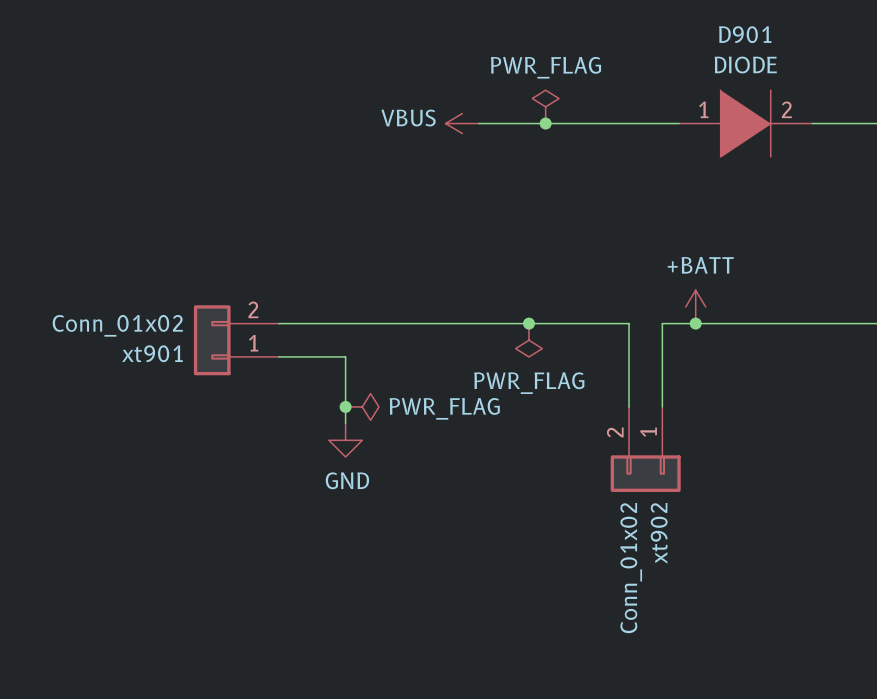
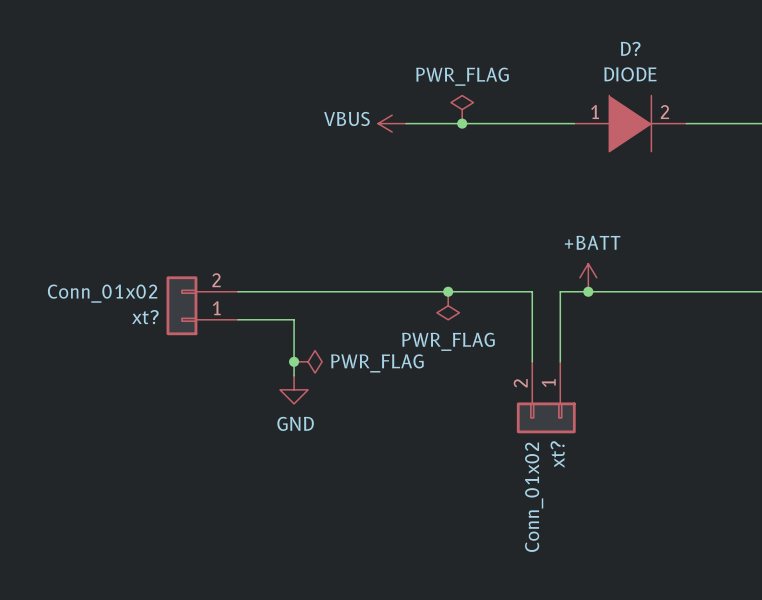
D901 name: D901 (745, 34) -> D? (630, 48)
xt901 name: xt901 (152, 353) -> xt? (145, 317)
xt902 name: xt902 (659, 533) -> xt? (557, 454)

